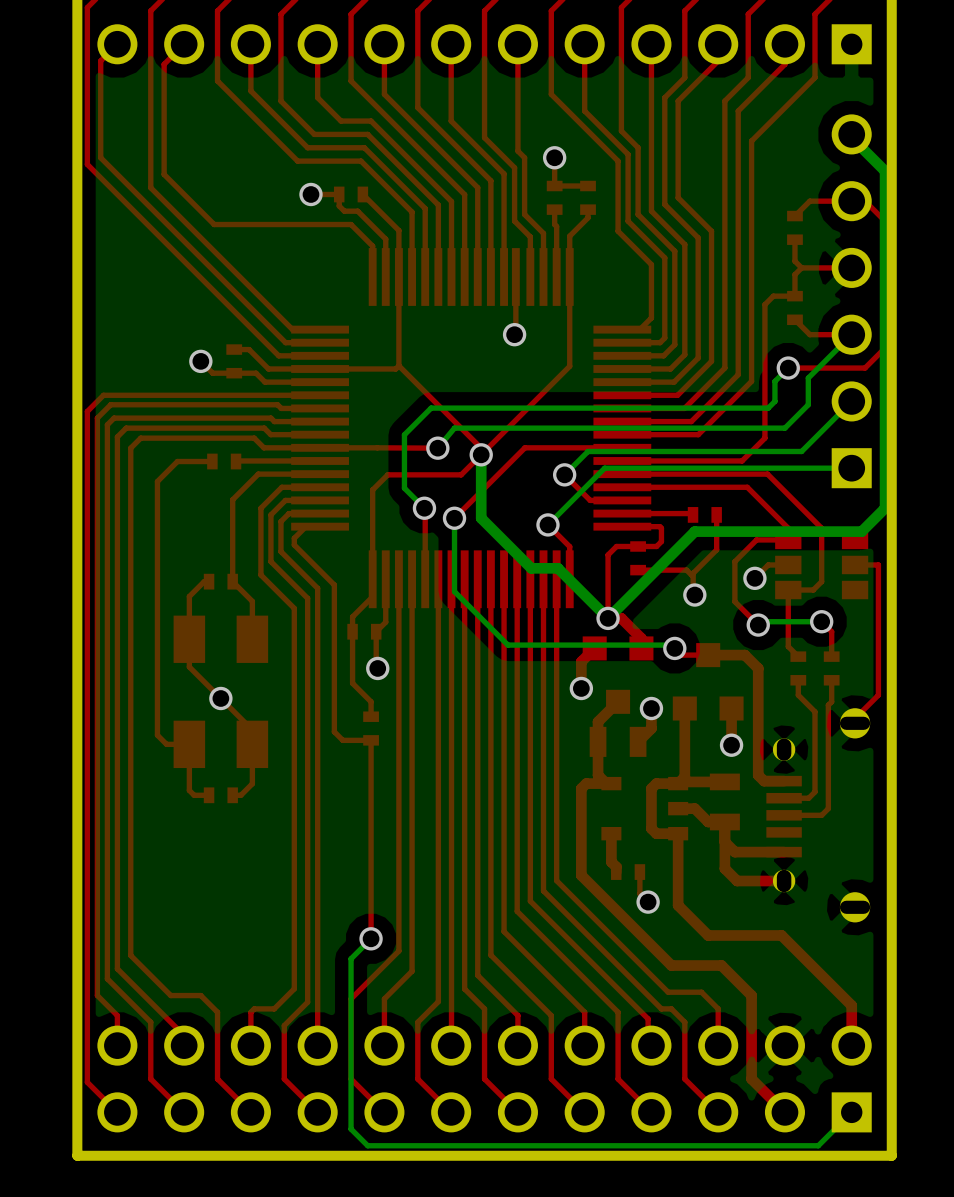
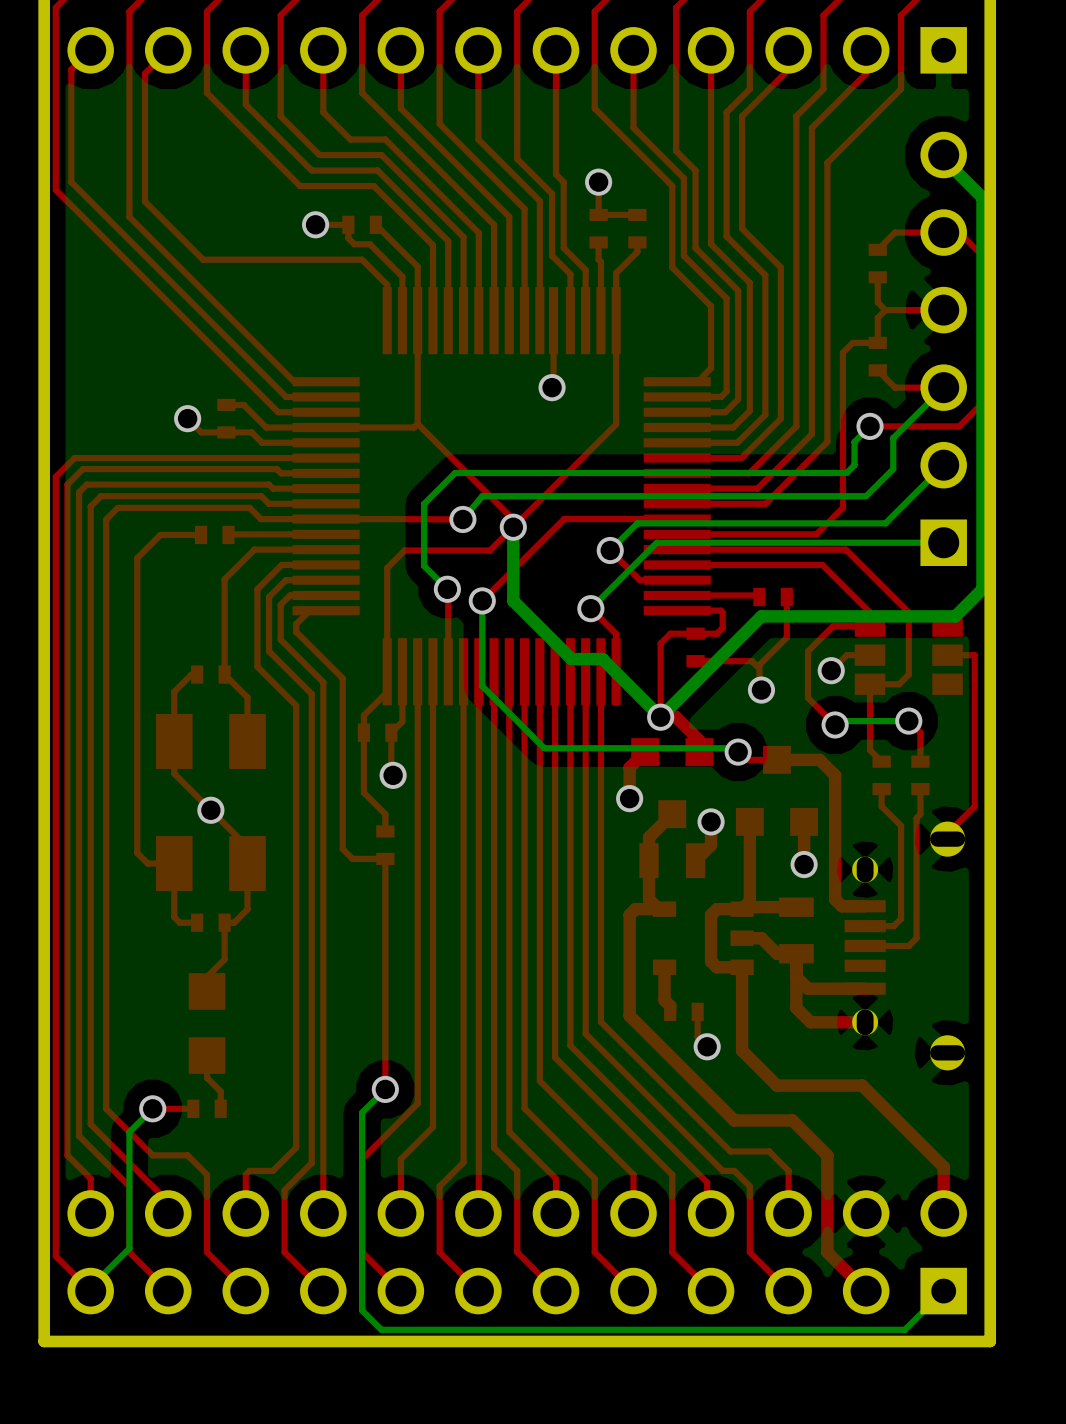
top track: none -> (224, 922) (224, 959) (207, 976) (207, 991)
part: none -> (207, 1023)
top track: none -> (207, 1055) (207, 1077) (220, 1091) (220, 1108)
bottom track: none -> (152, 1108) (129, 1132) (129, 1248) (90, 1287) (90, 1291)
via: none -> (152, 1108)
top track: none -> (193, 1108) (152, 1108)
part: none -> (207, 1108)

